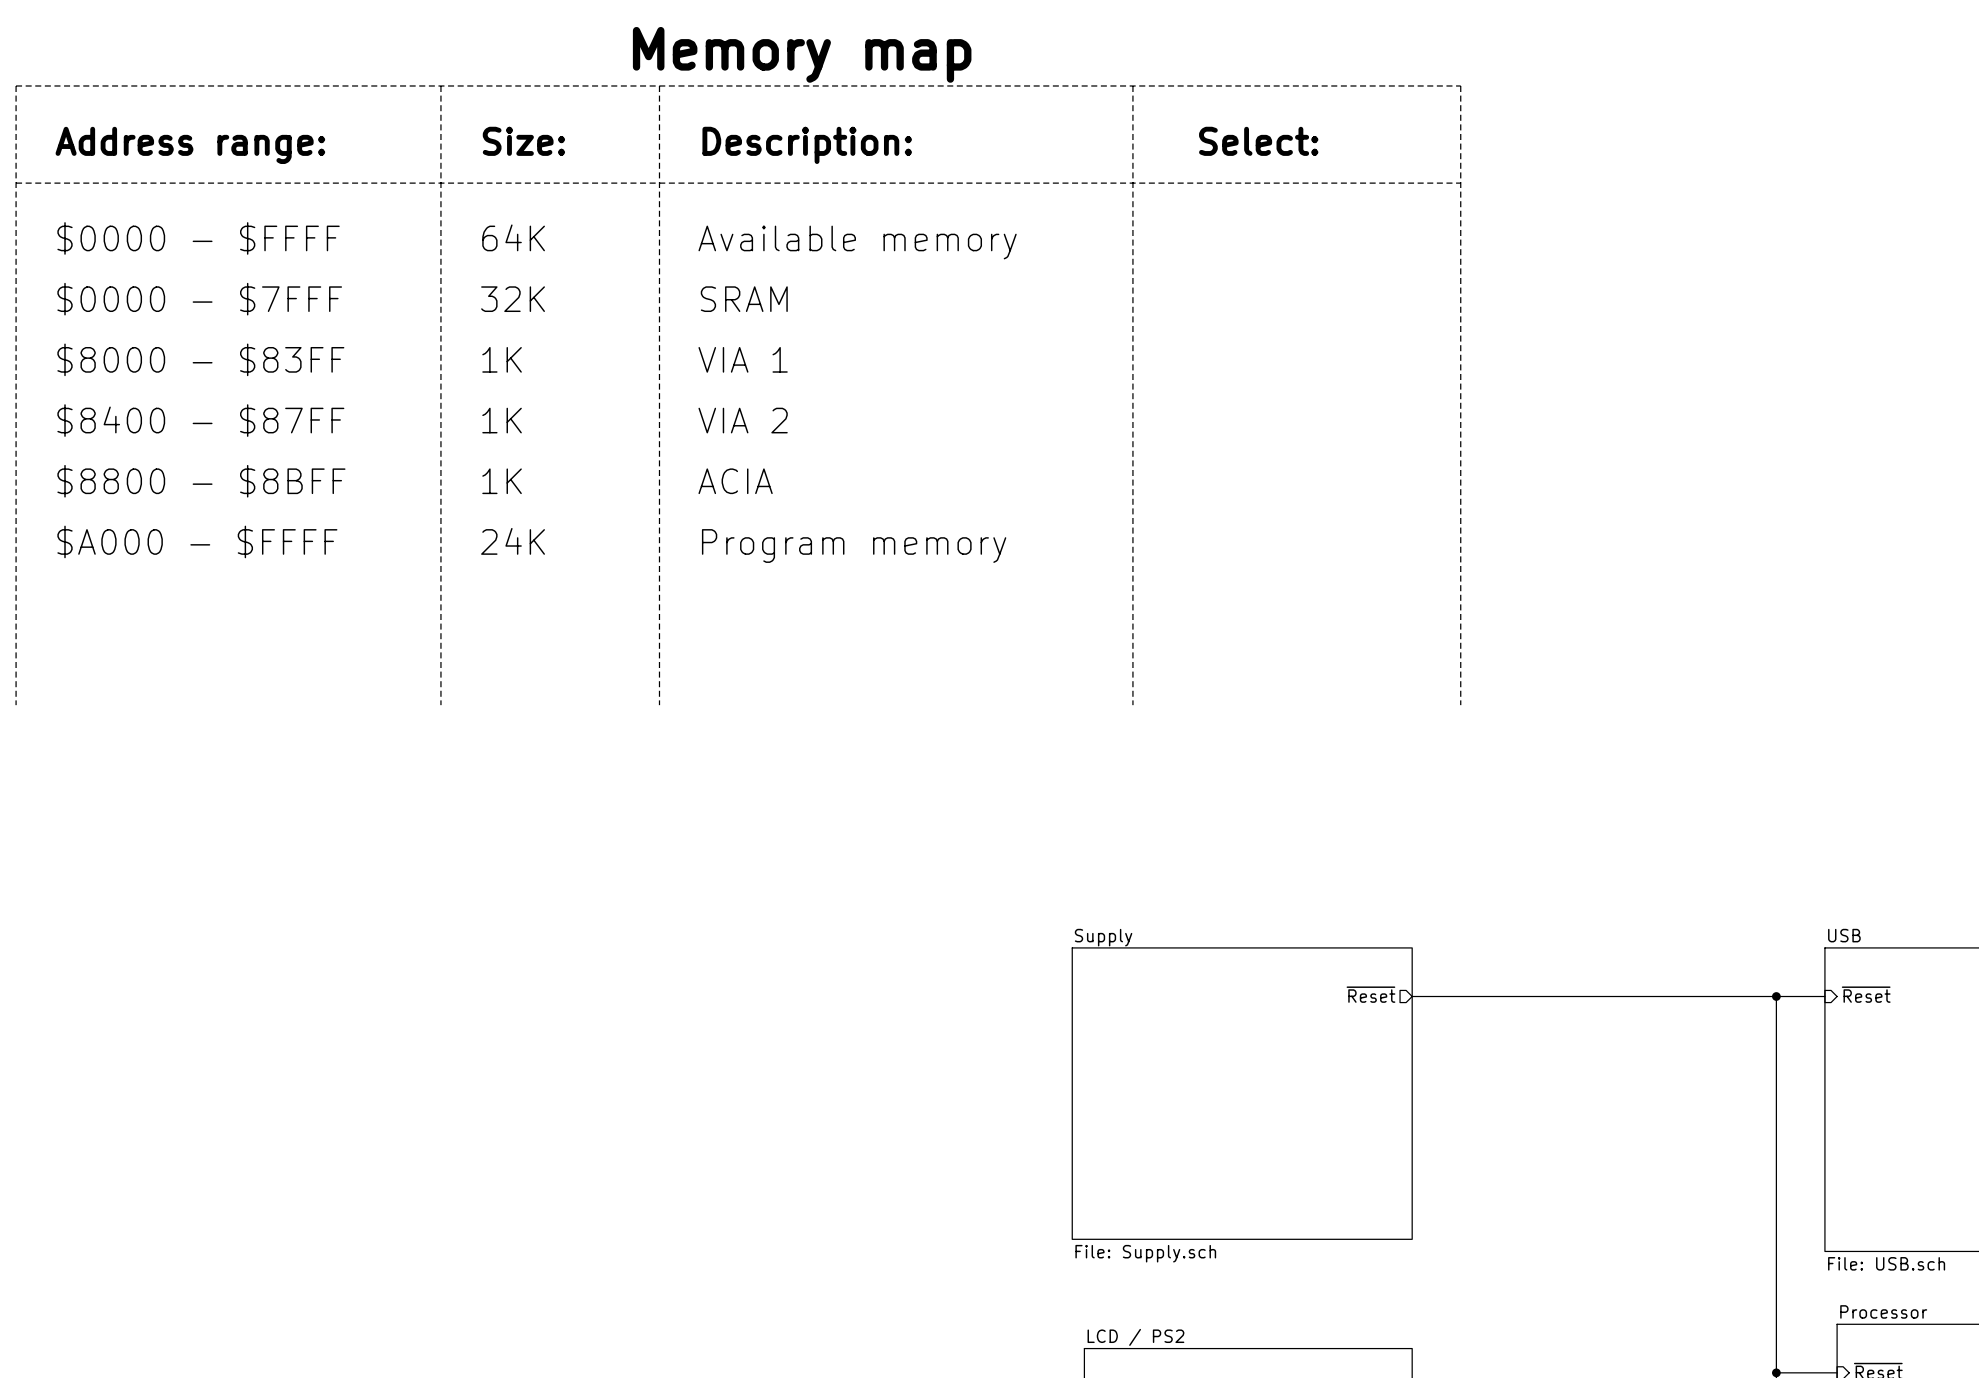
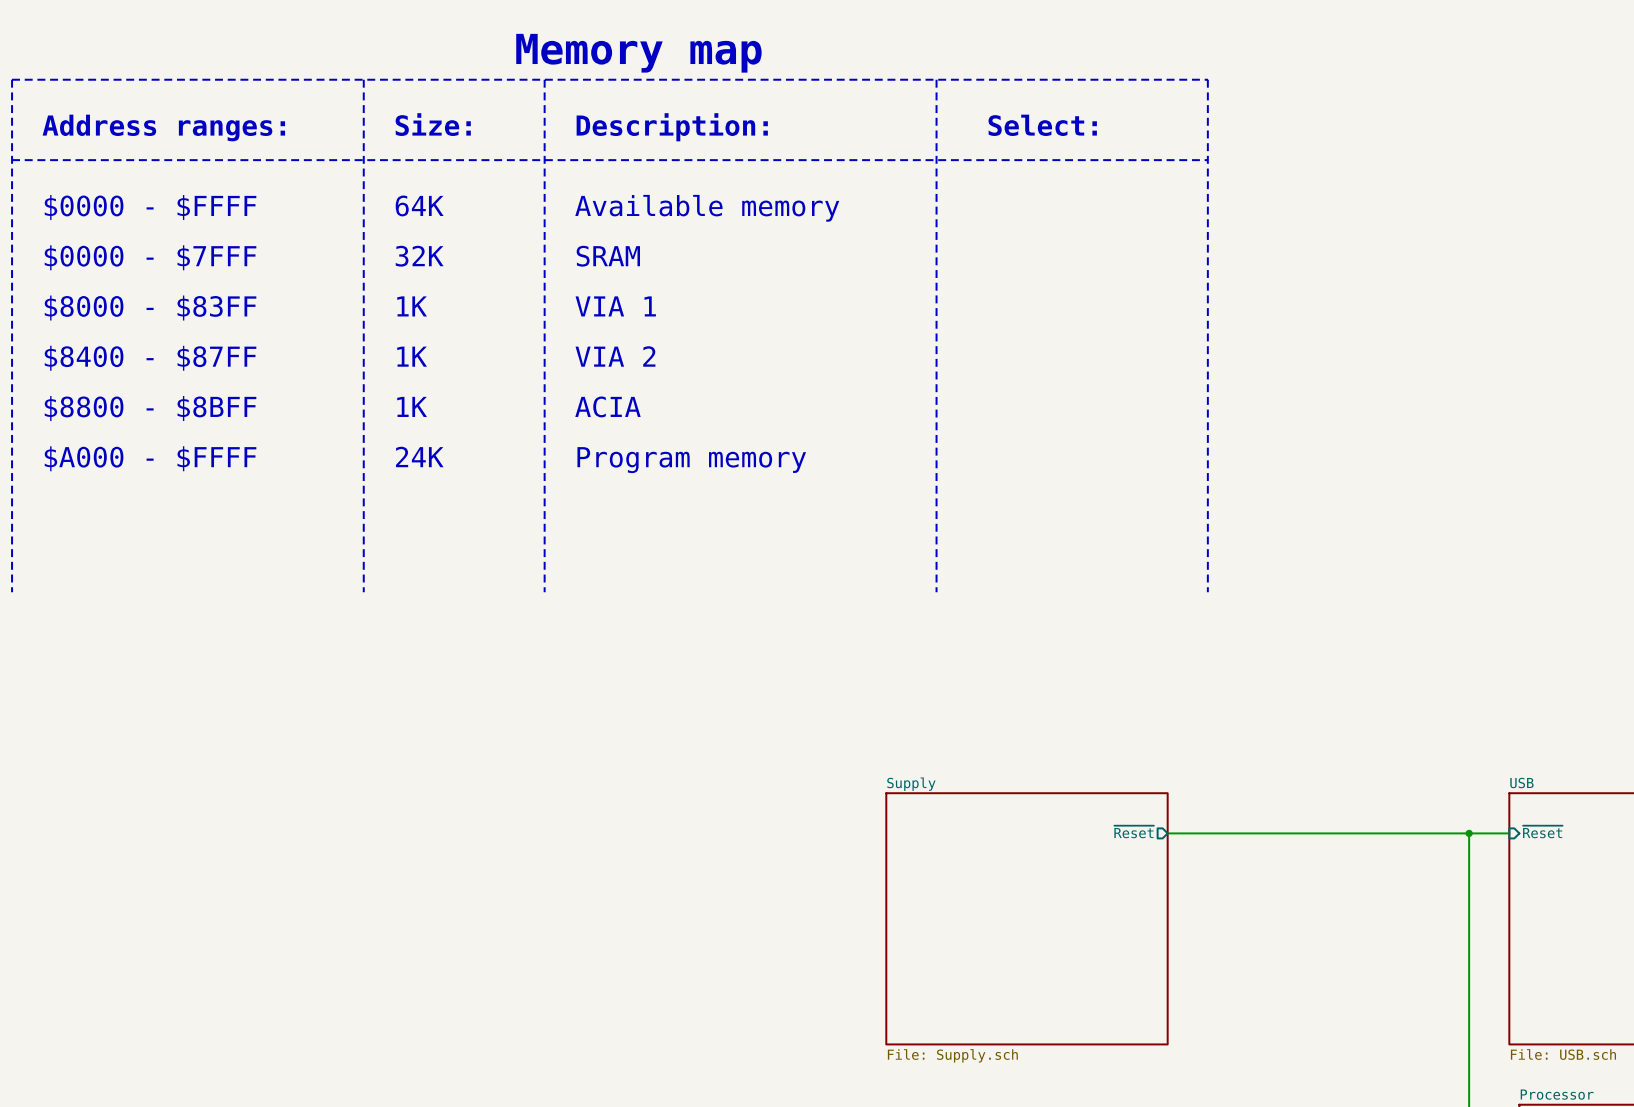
text: Address range: (190, 145) -> Address ranges: (163, 127)
sheet Supply shape: [1072, 947, 1413, 1240] -> [886, 793, 1168, 1045]

